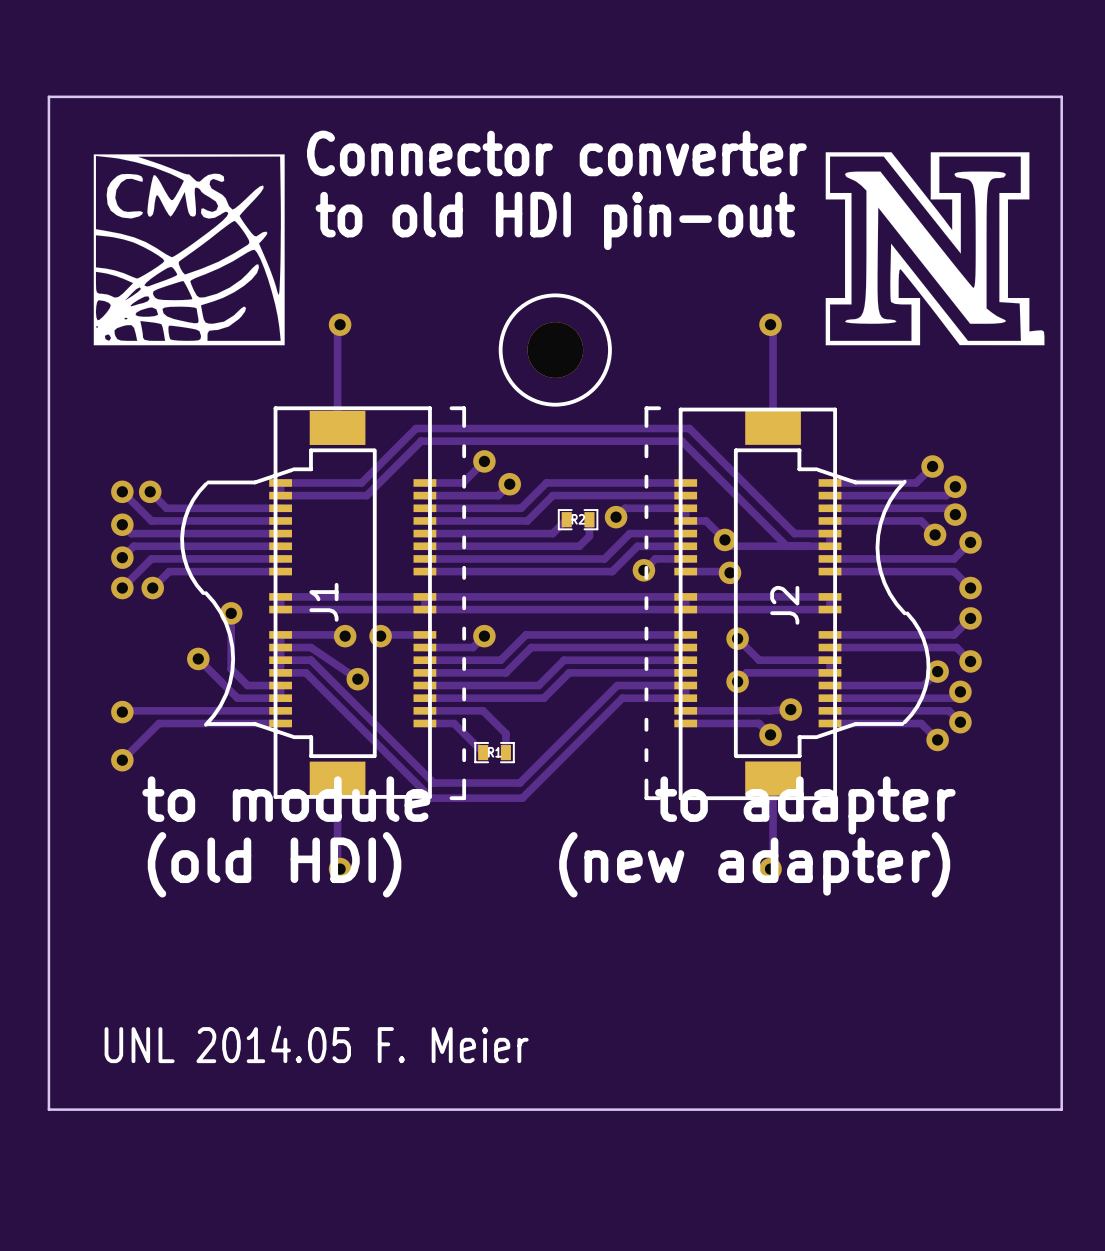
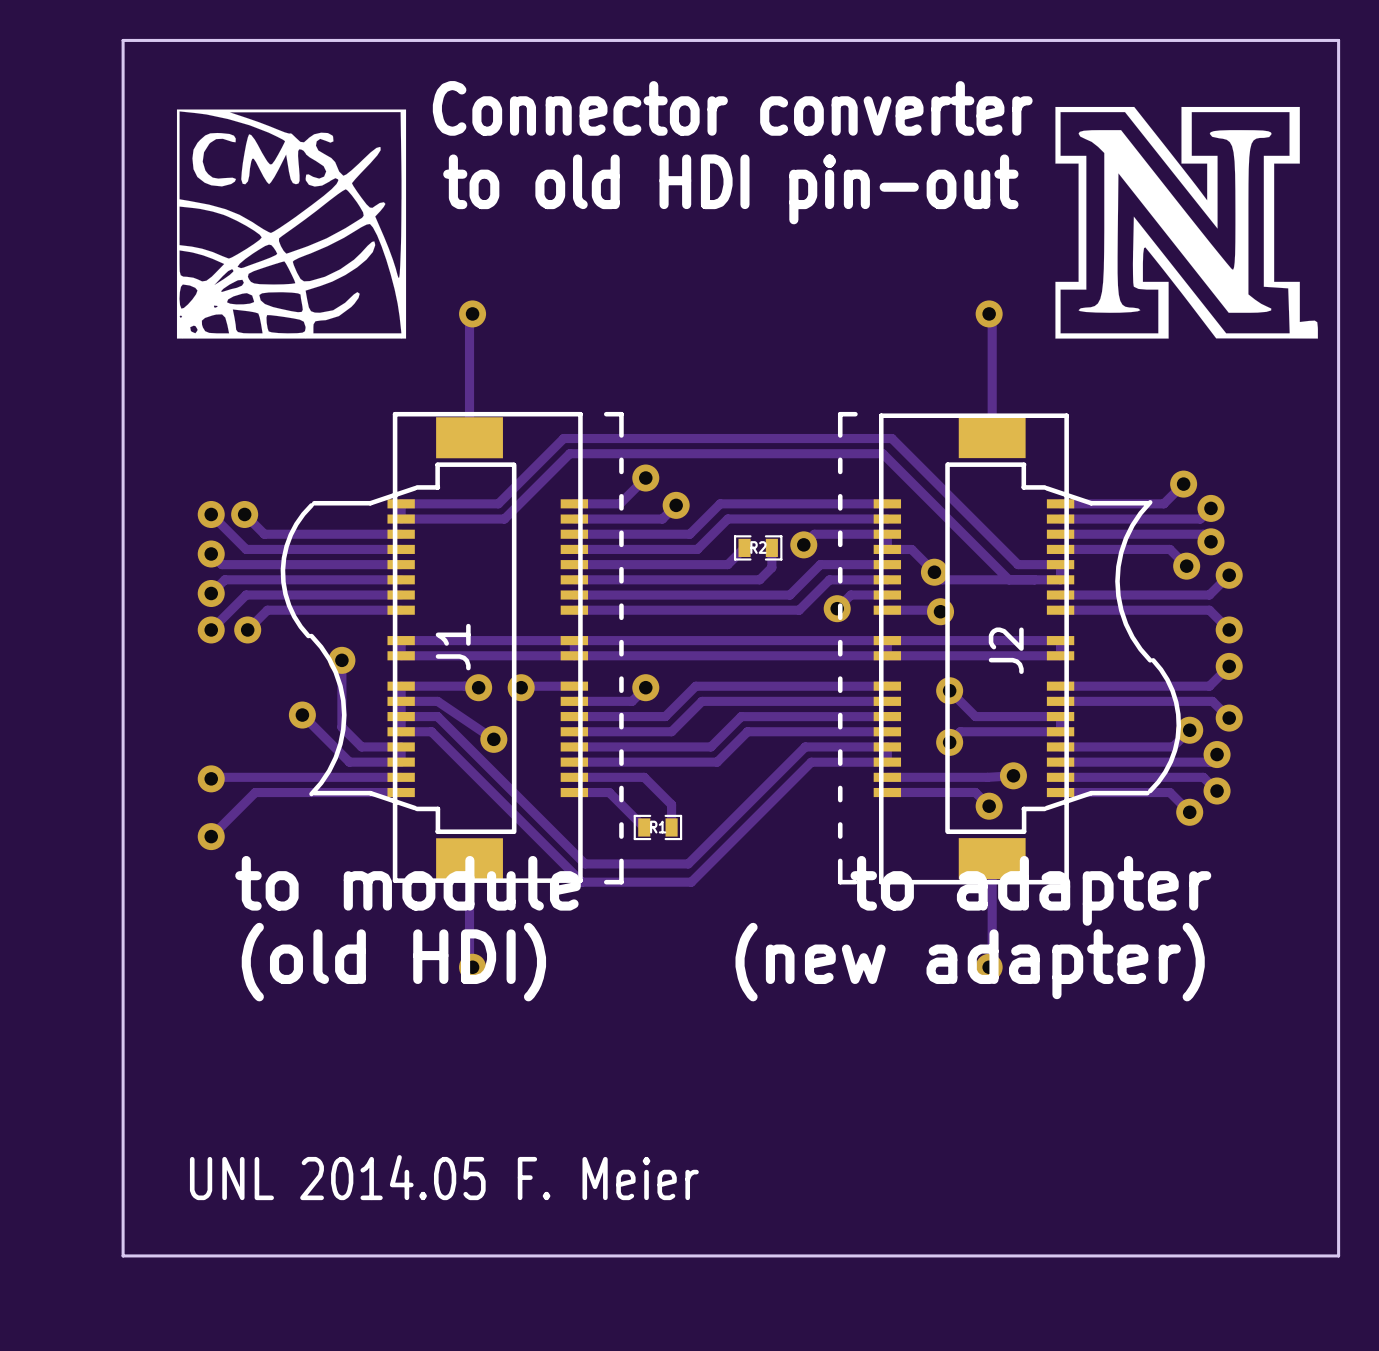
part: (555, 350) -> none

